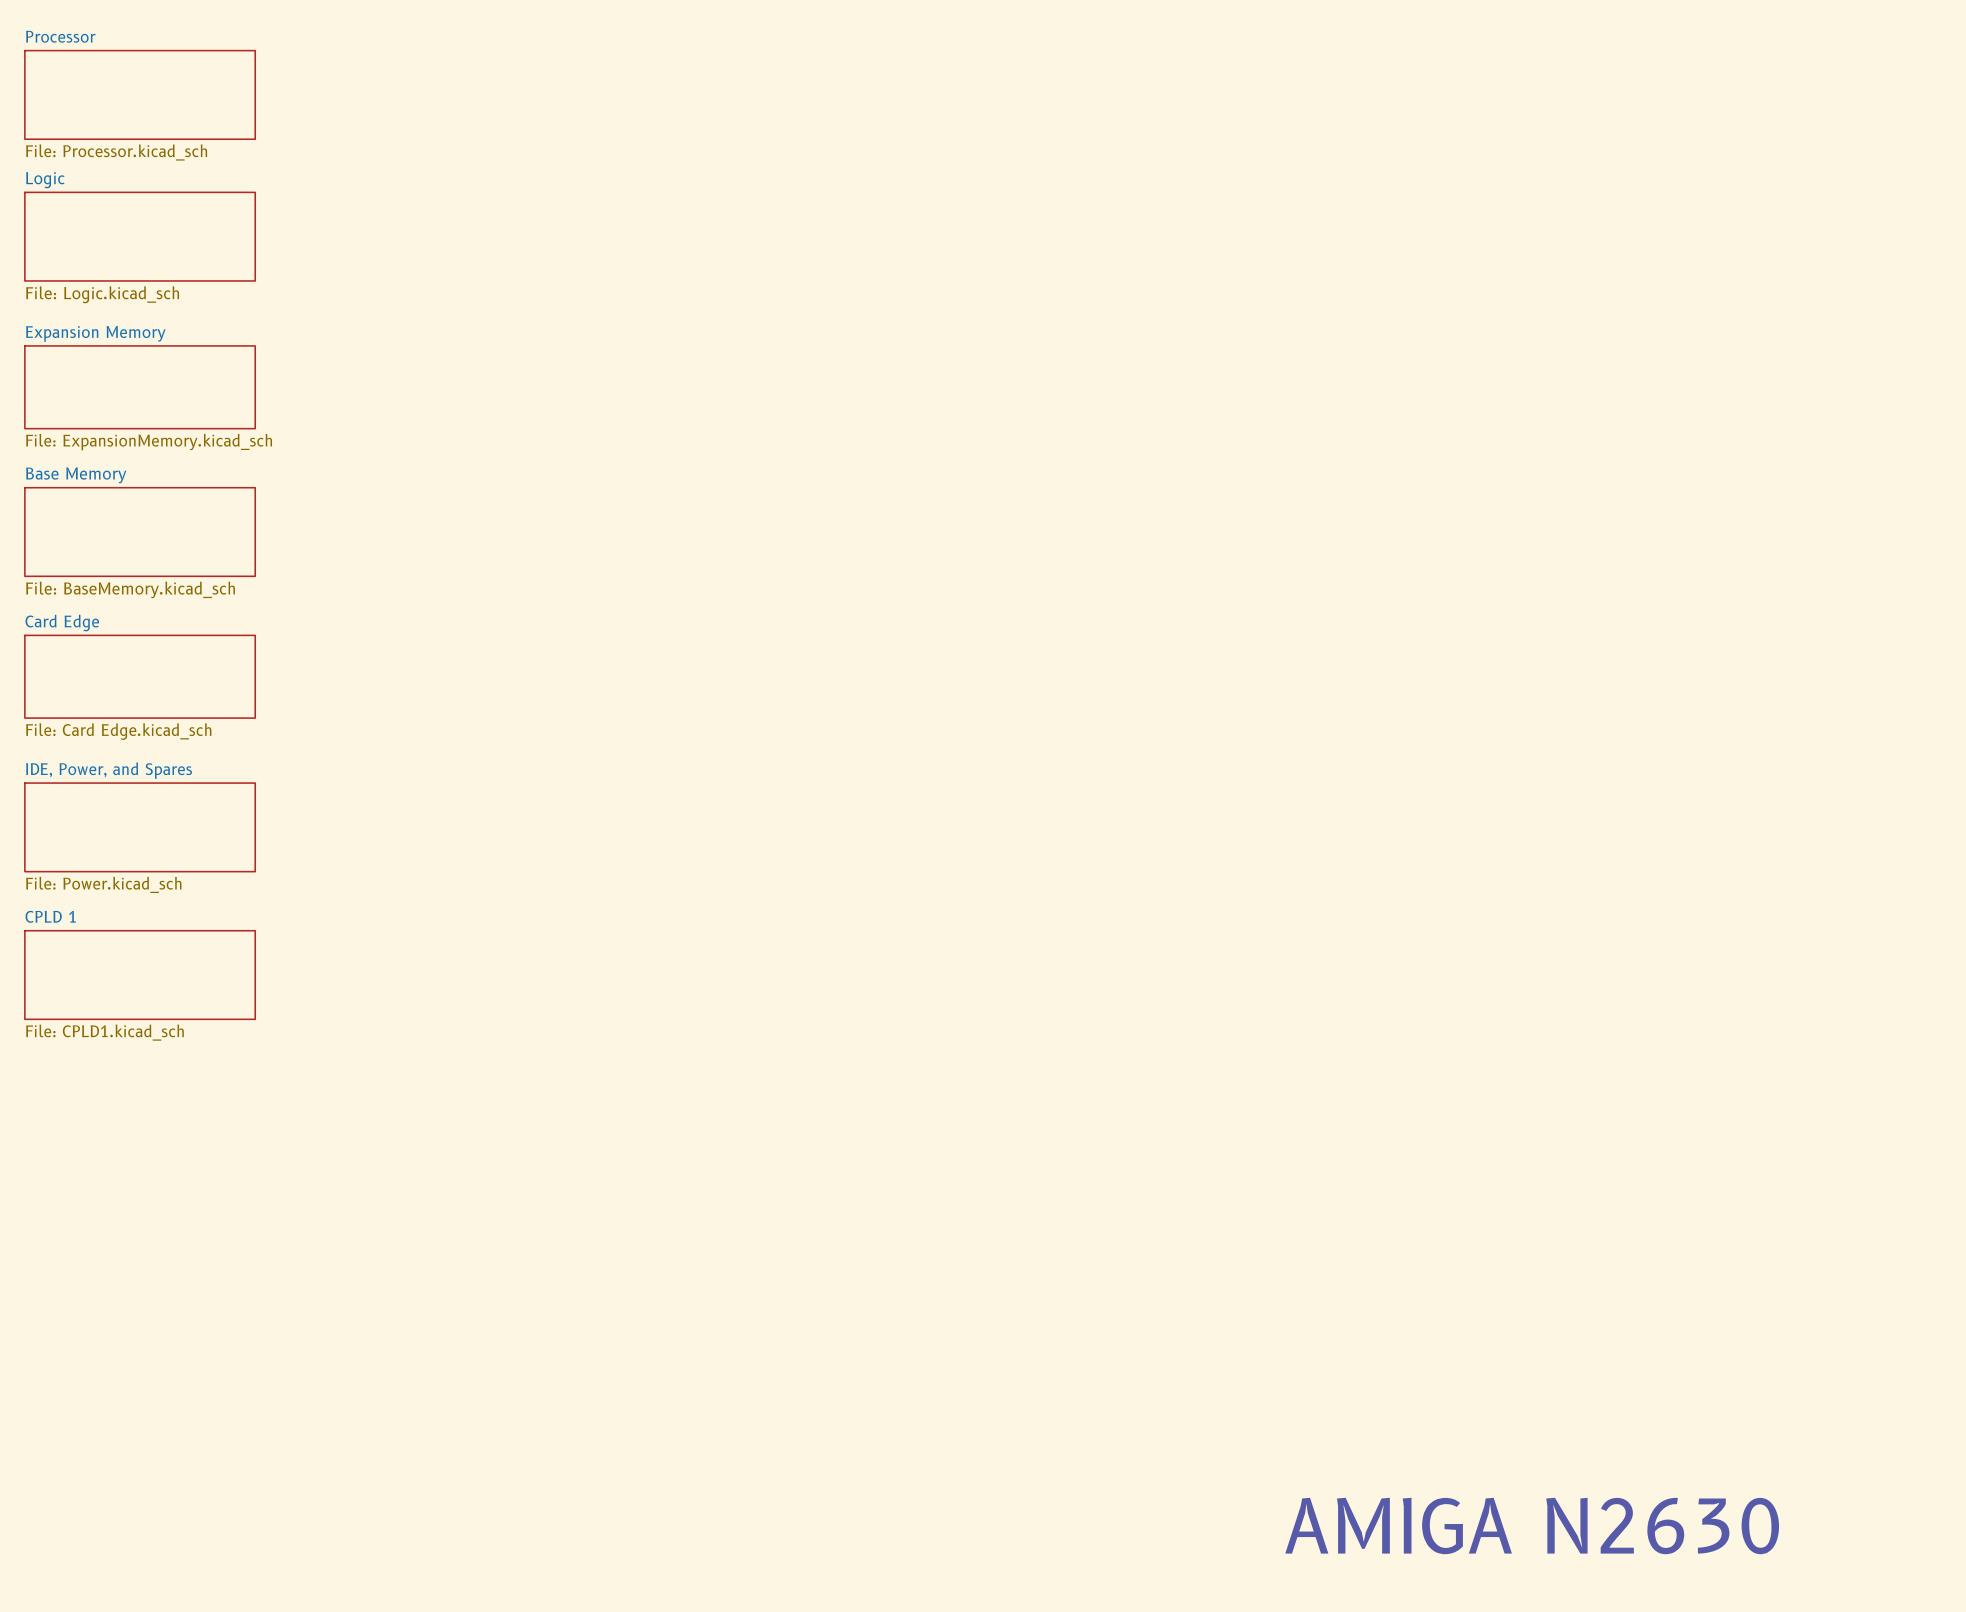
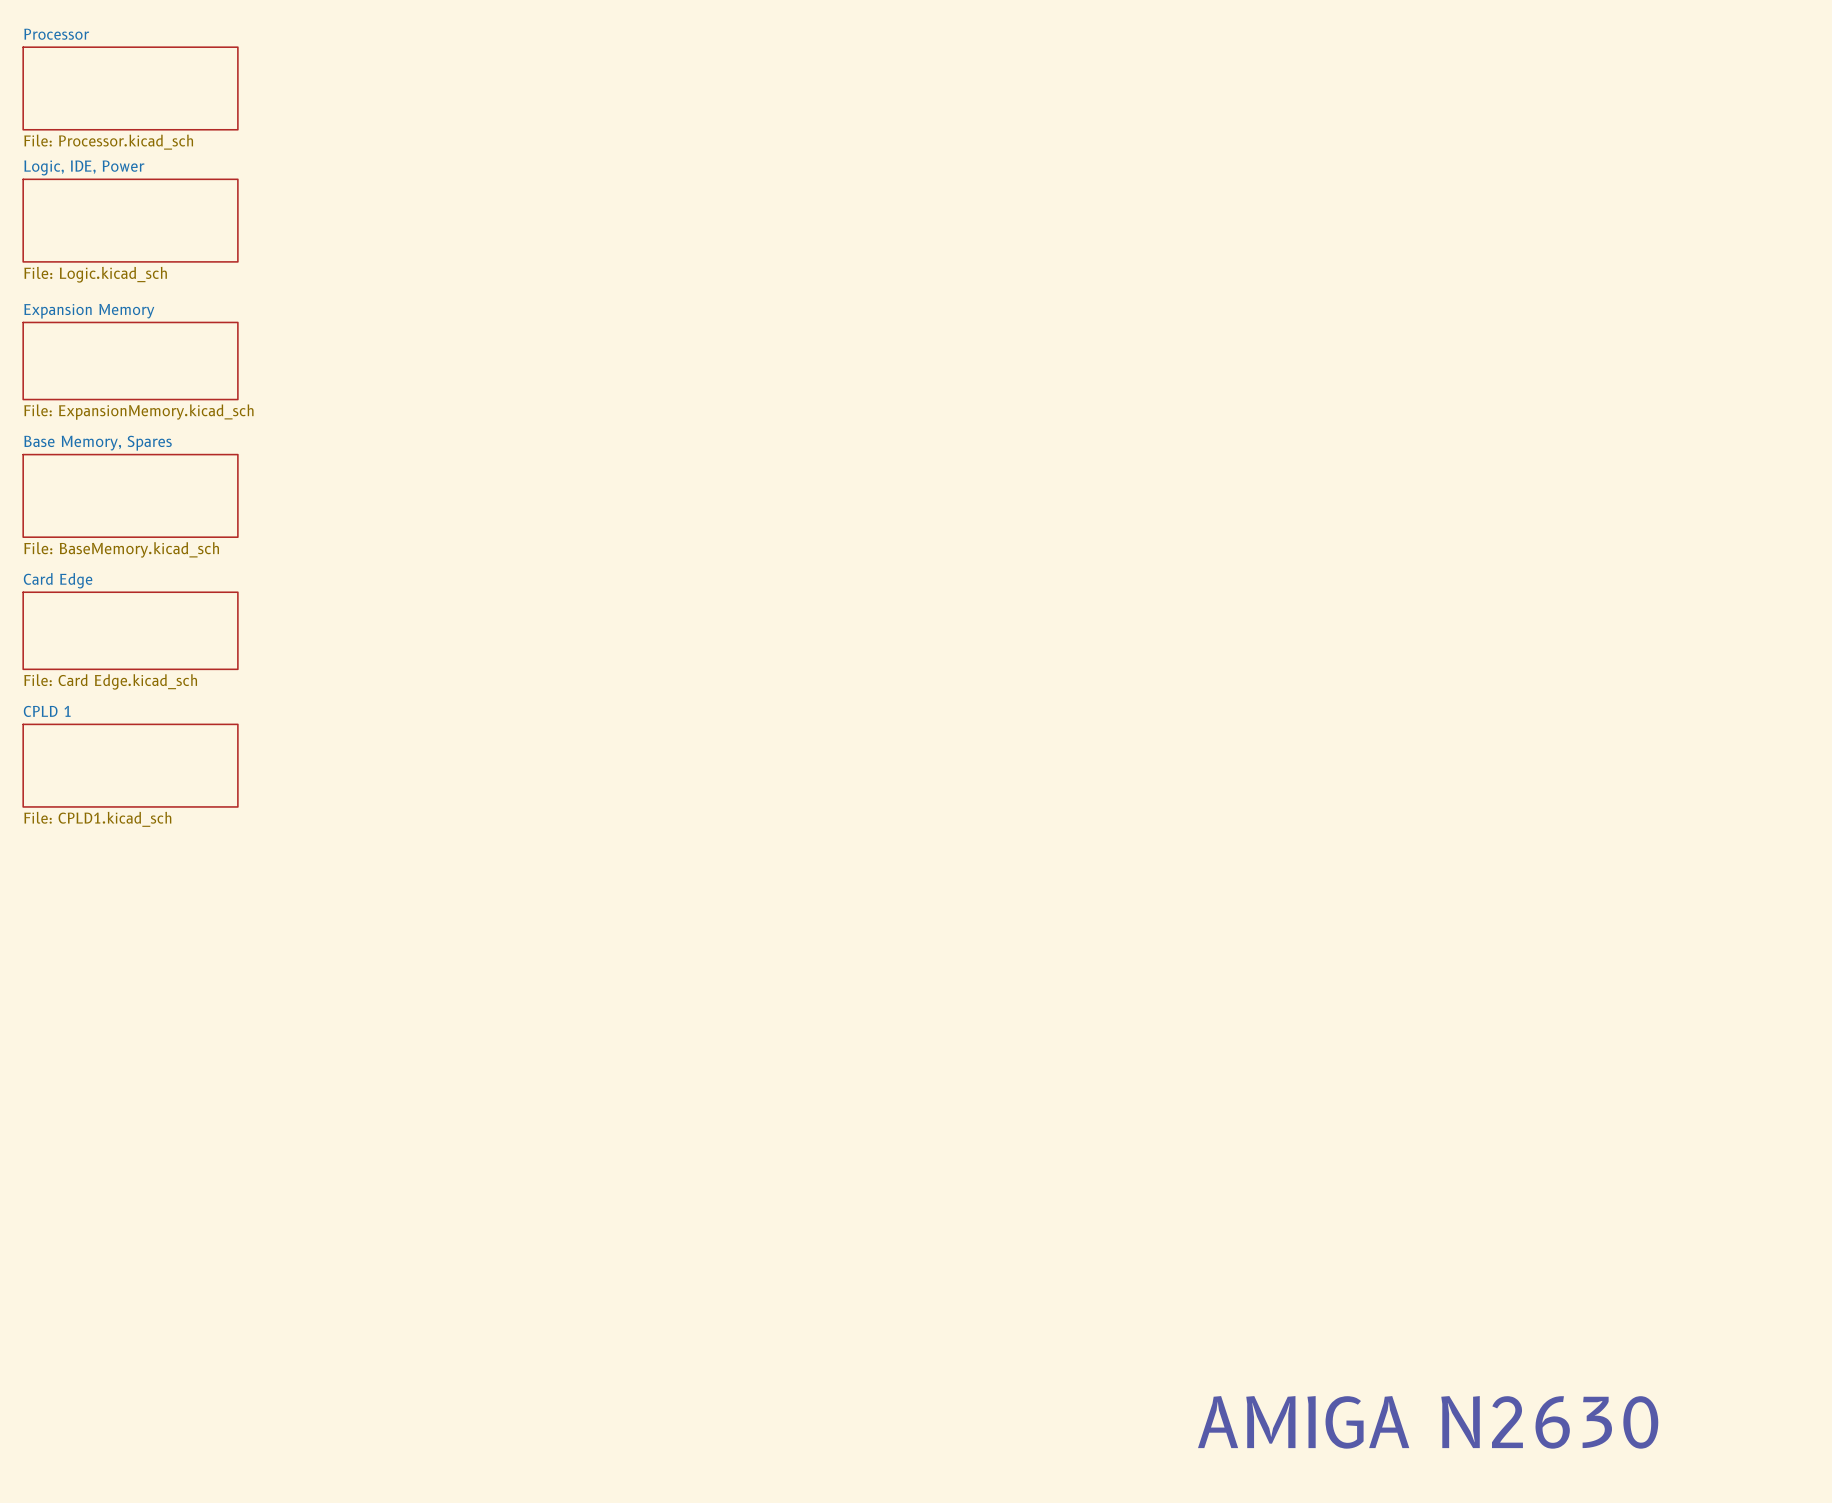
sheet Logic name: Logic (45, 180) -> Logic, IDE, Power (84, 167)
sheet Base Memory name: Base Memory (76, 475) -> Base Memory, Spares (98, 443)
sheet IDE, Power, and Spares: File: Power.kicad_sch (140, 827) -> none
sheet CPLD 1 position: (140, 975) -> (130, 765)

